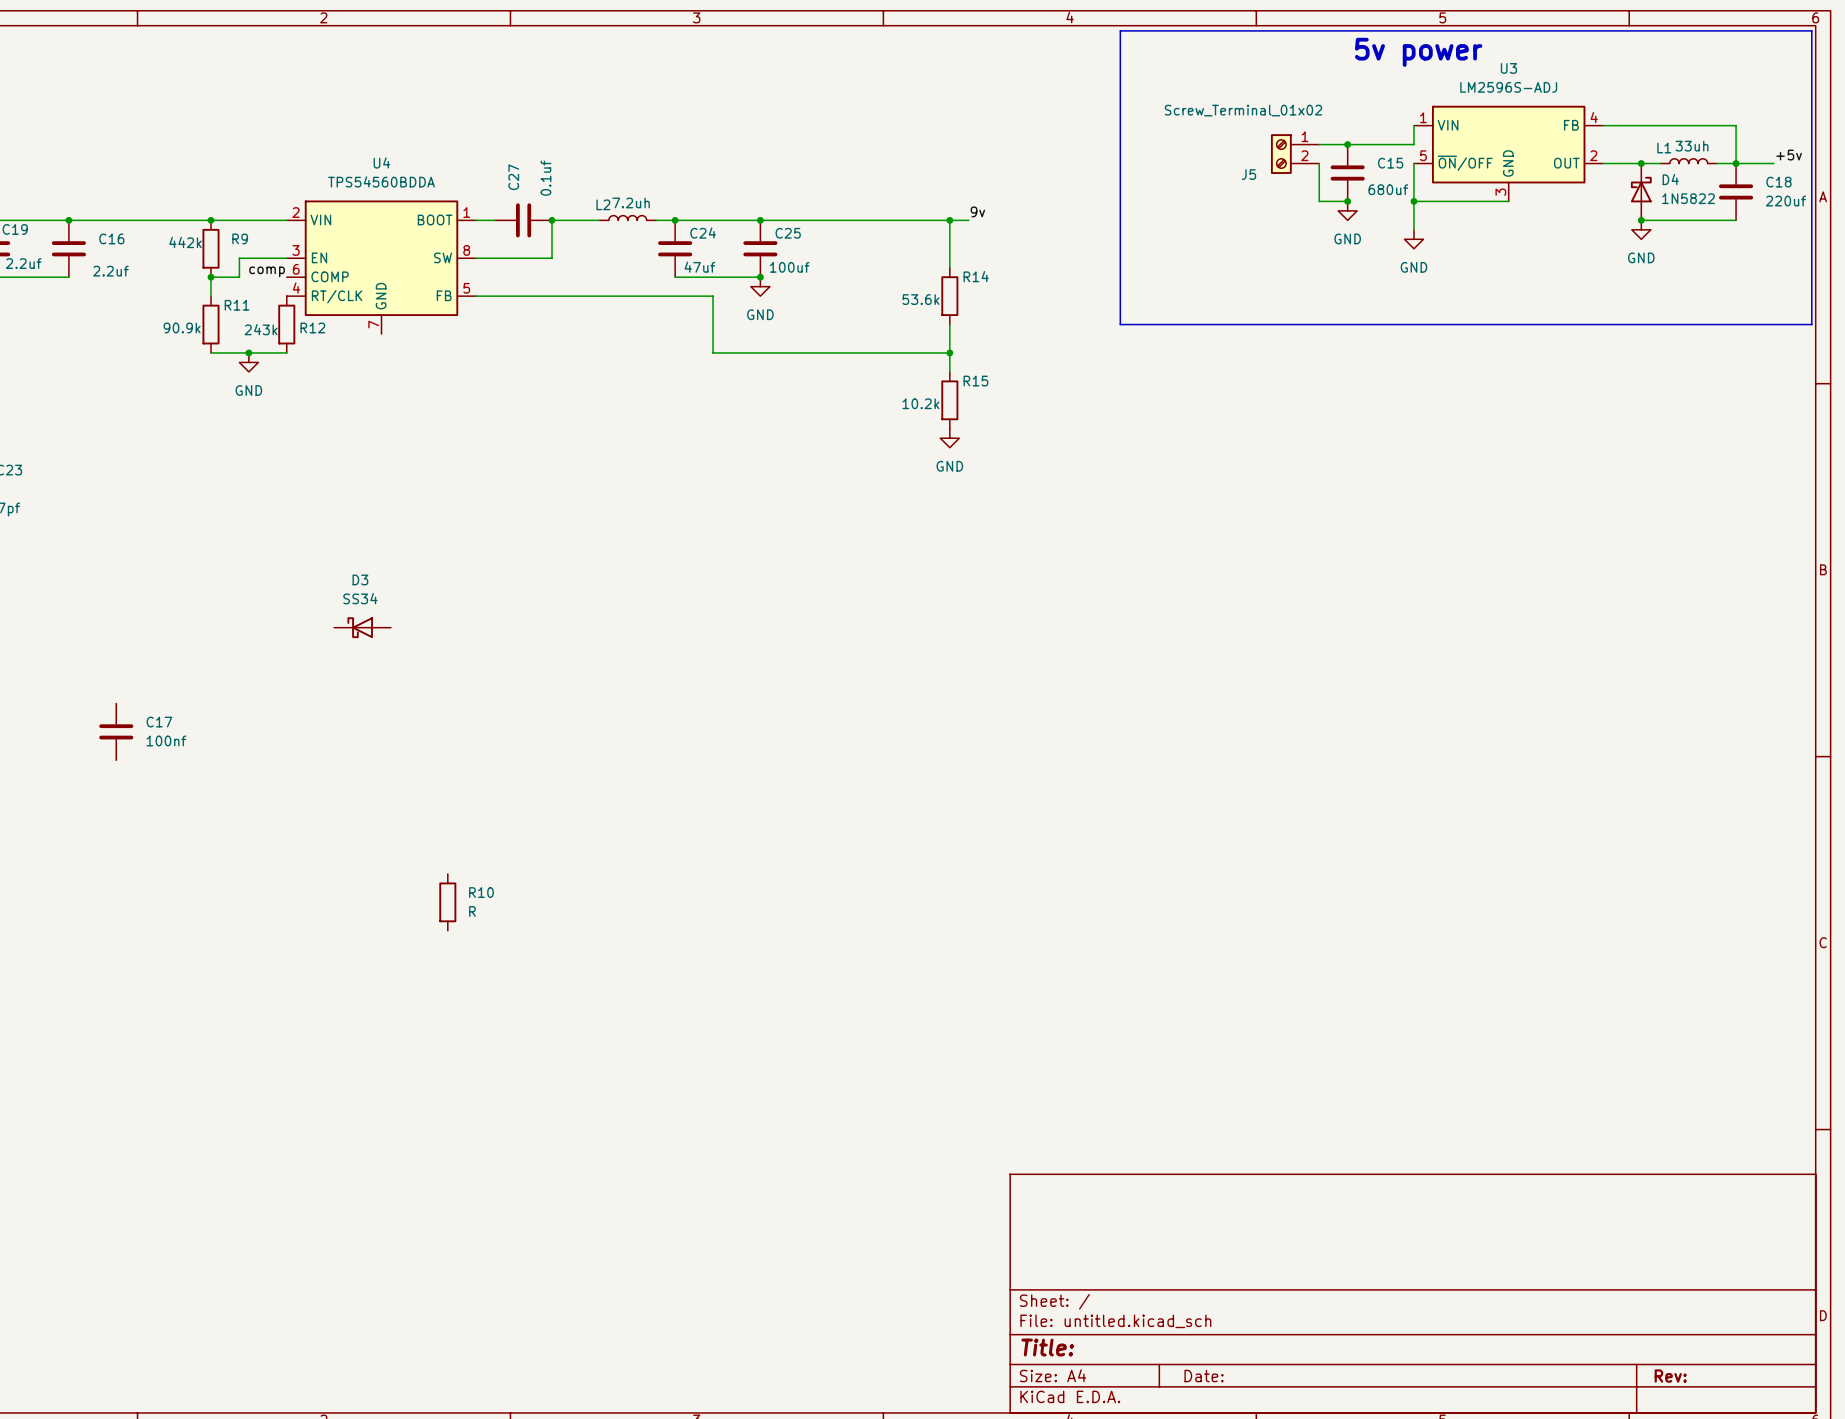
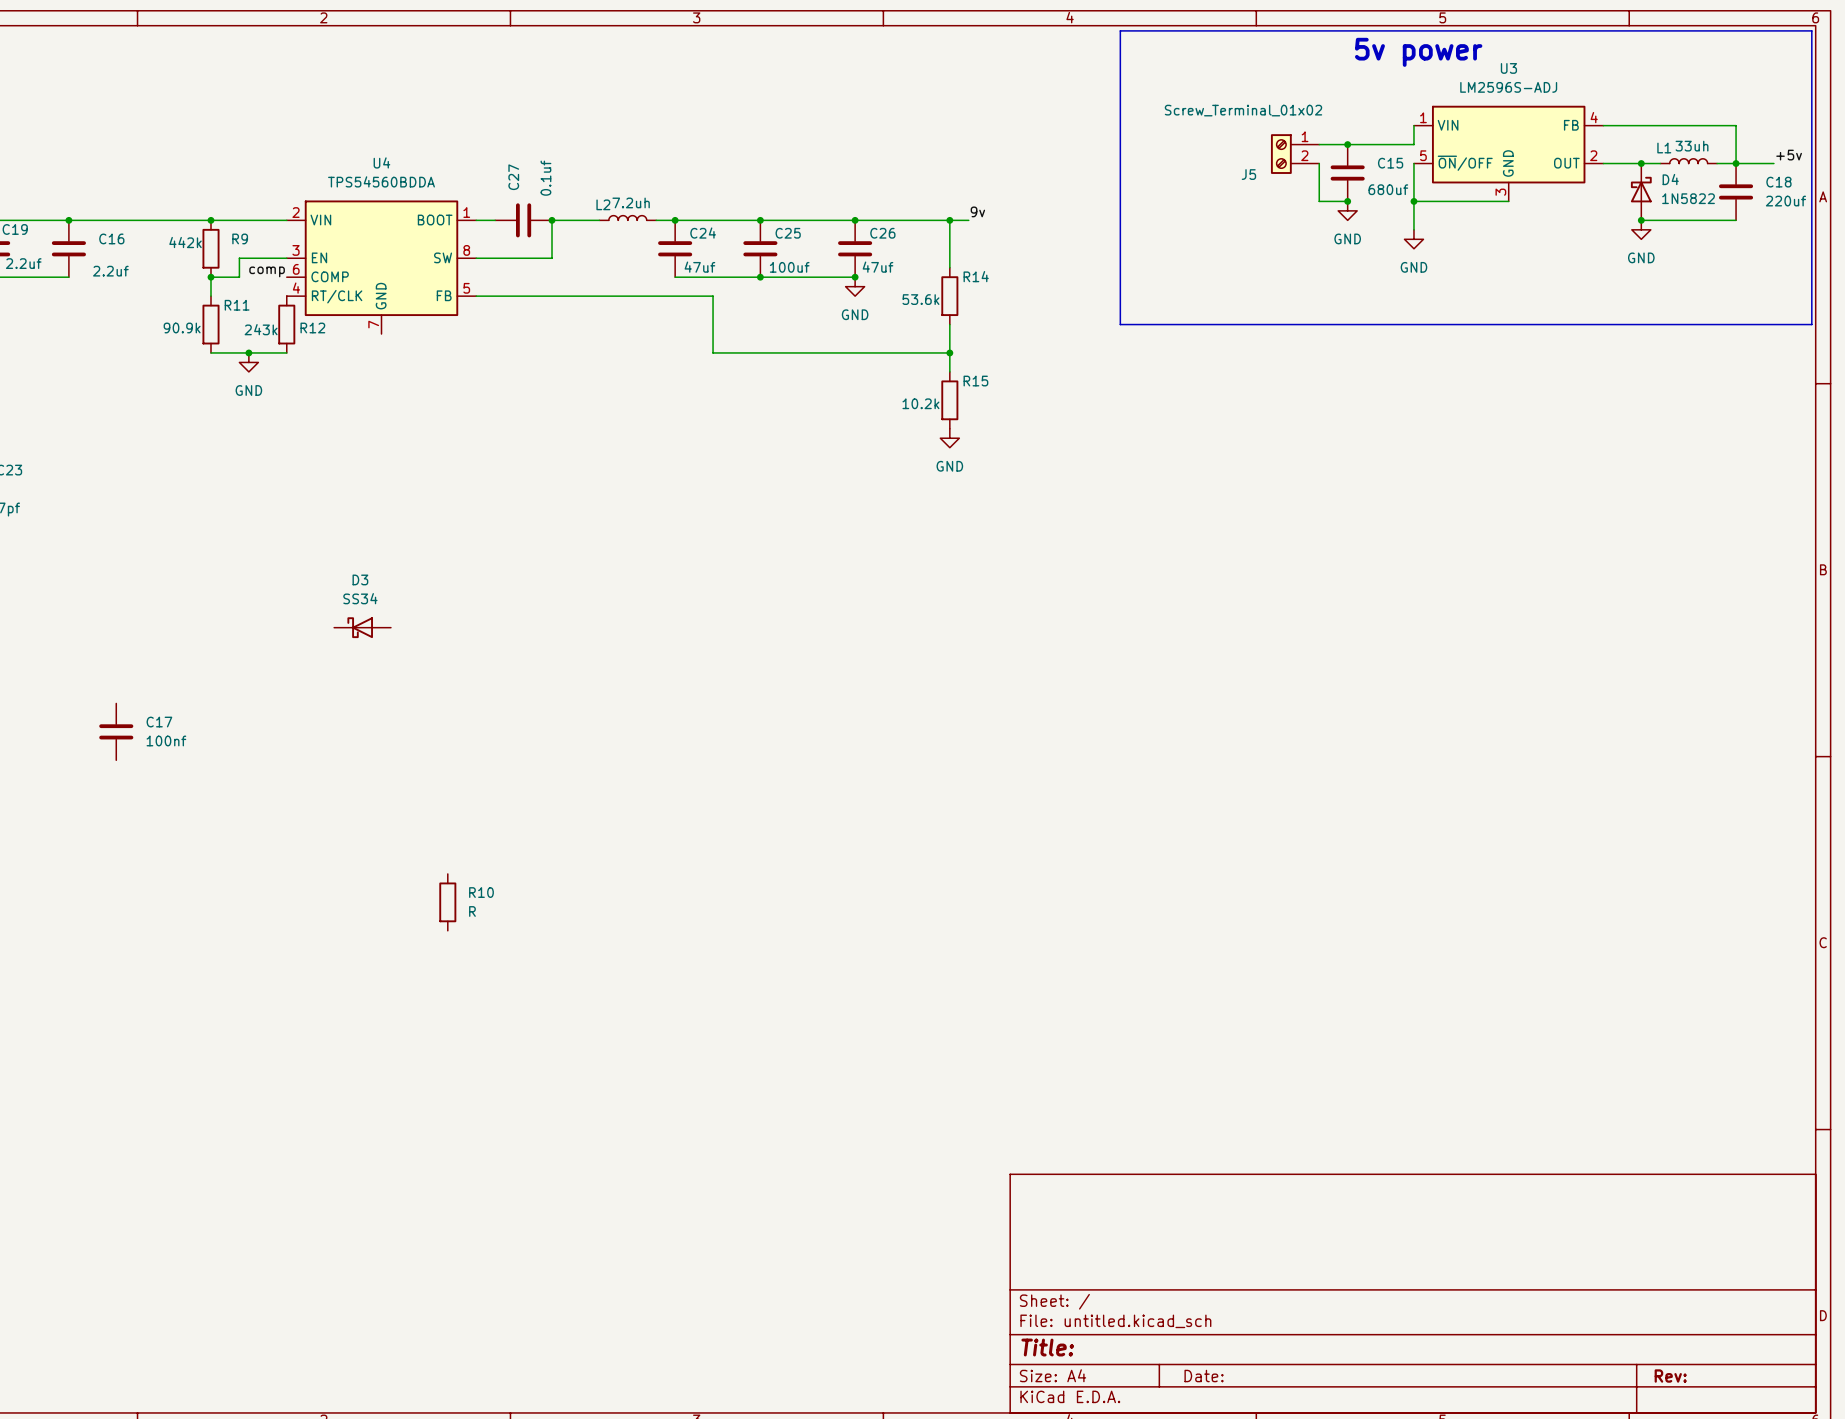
junction: none -> (855, 220)
C26: none -> 47uf (855, 248)
wire: none -> (760, 277) (855, 277)
junction: none -> (855, 277)
power symbol position: GND (760, 286) -> GND (855, 286)

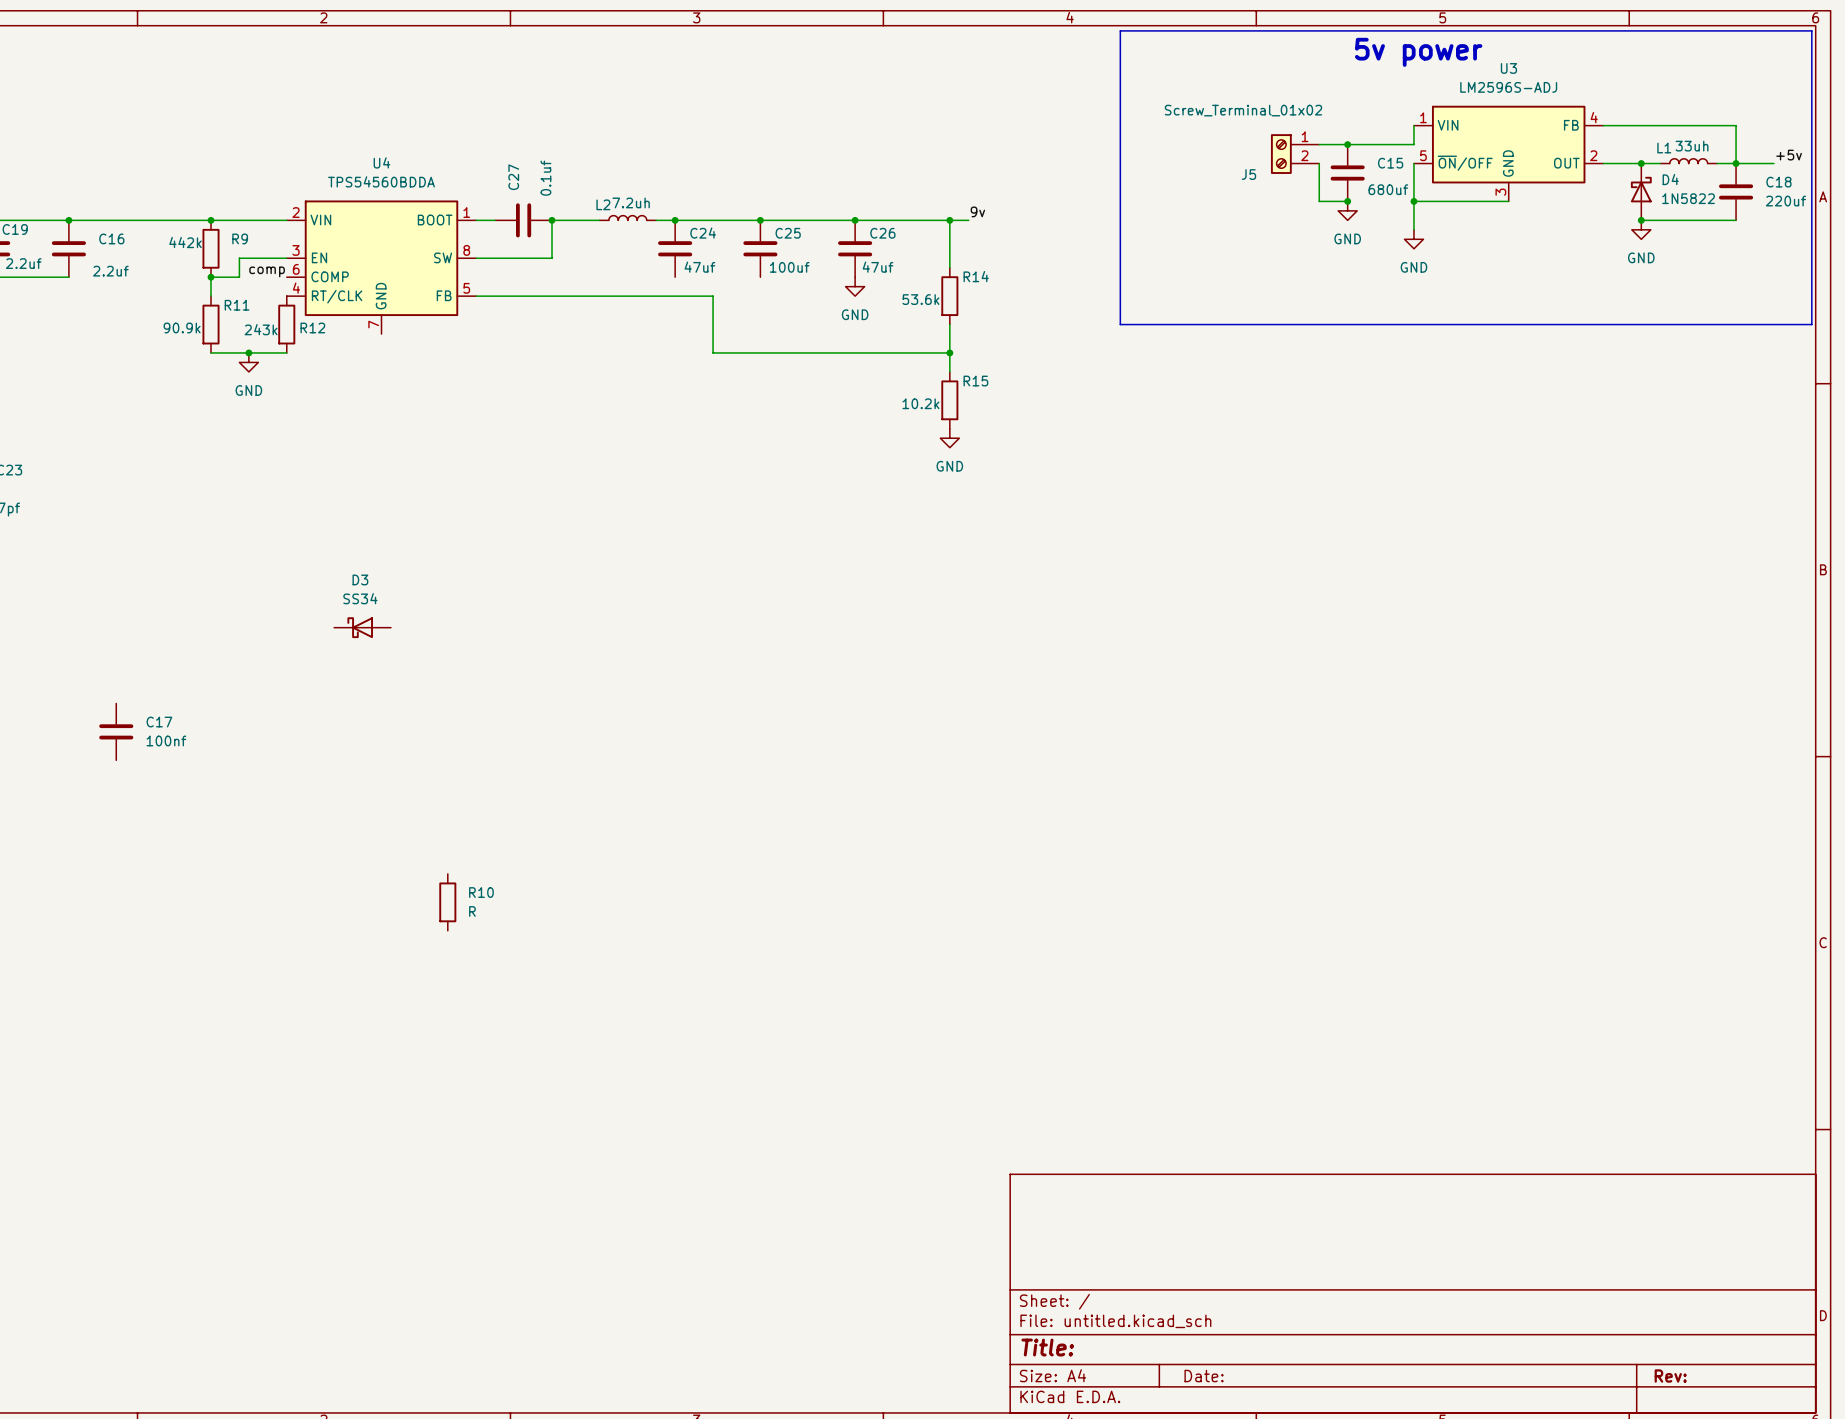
wire: (675, 277) (855, 277) -> none
junction: (760, 277) -> none
junction: (855, 277) -> none

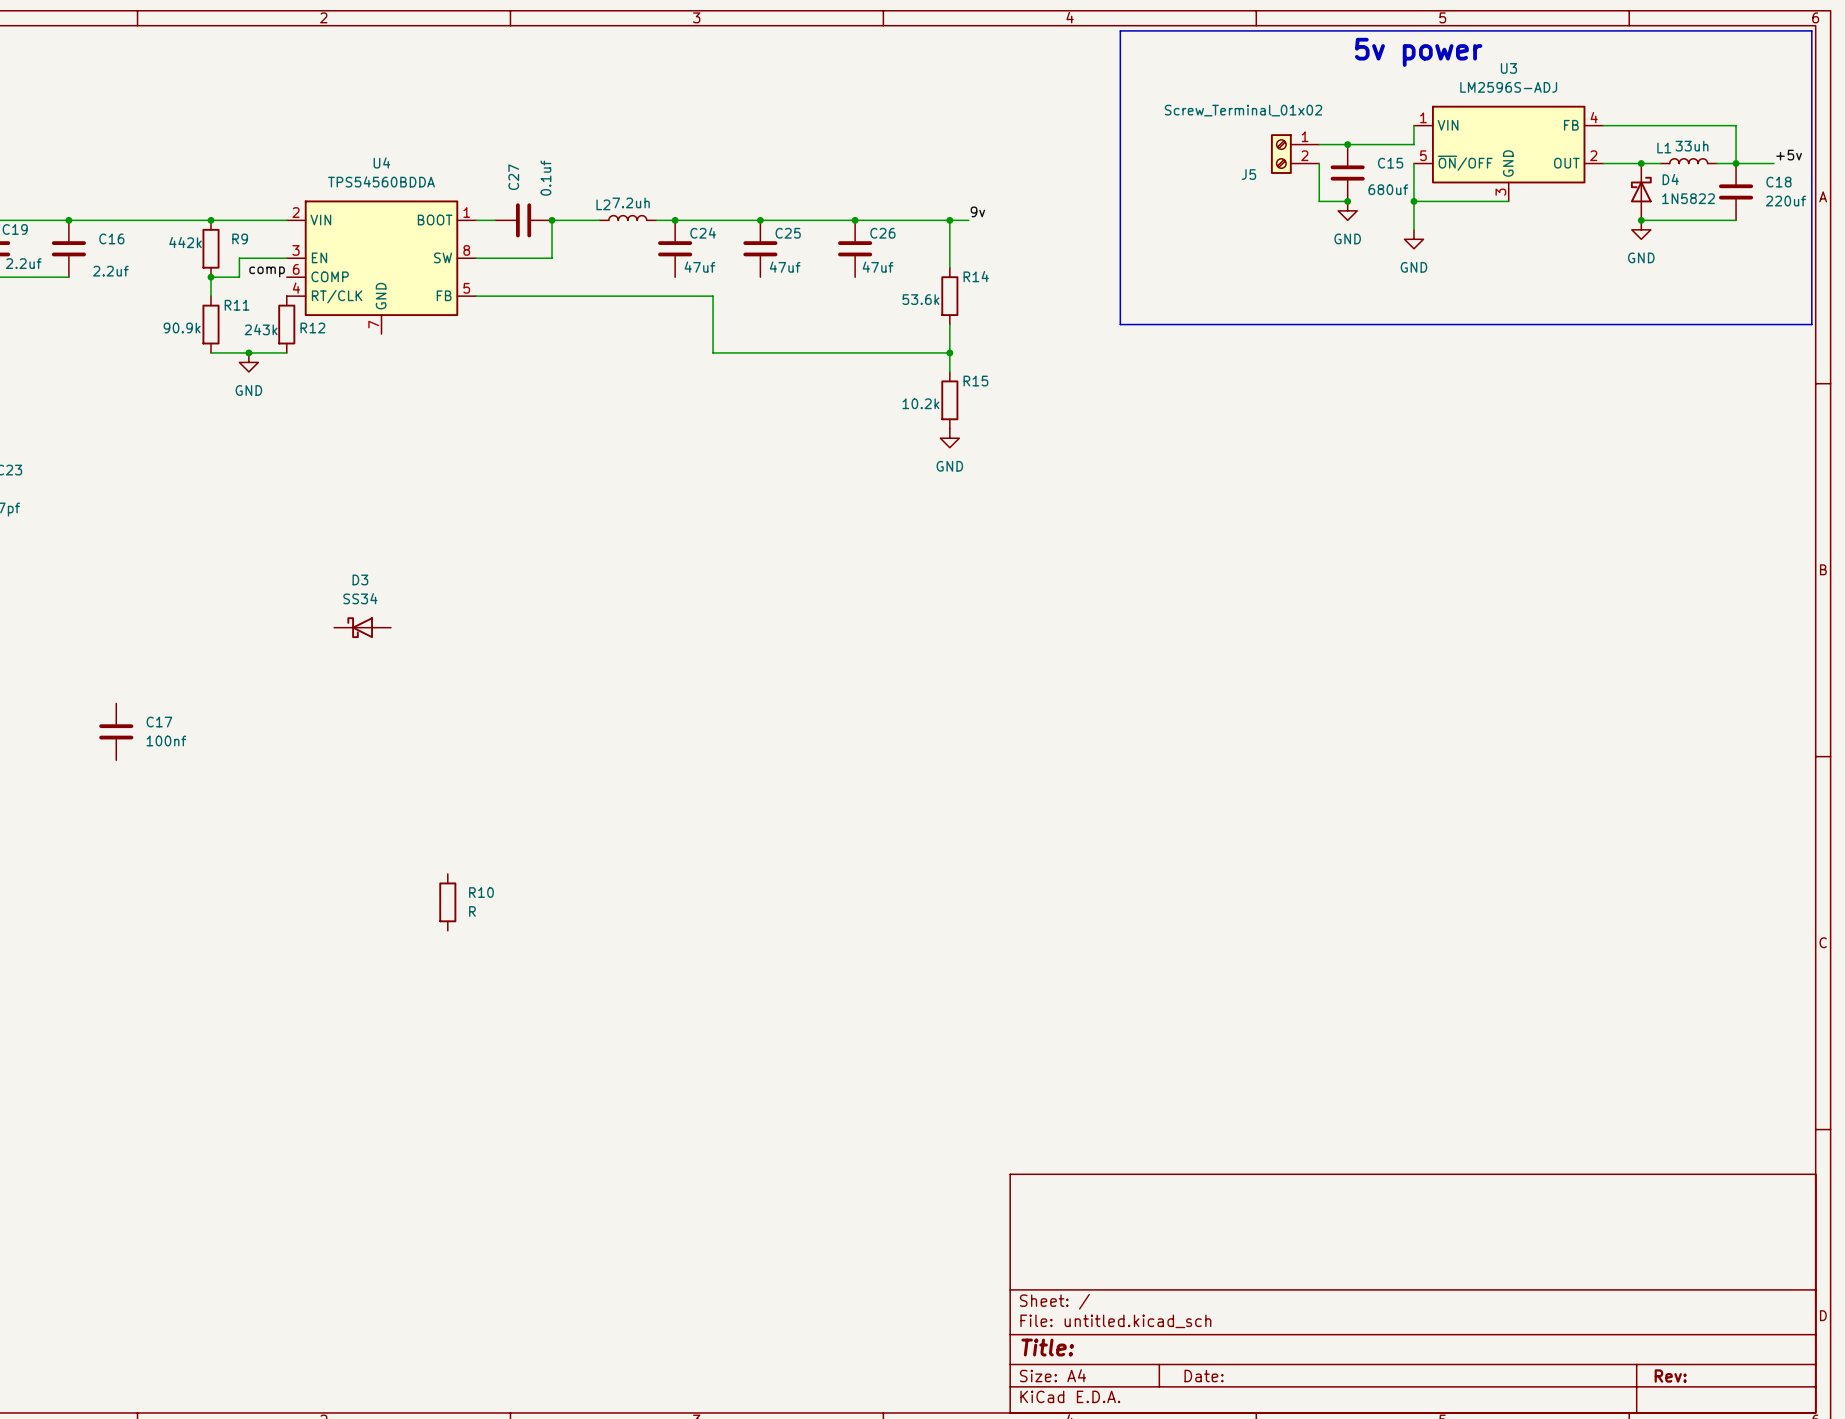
C25 value: 100uf (789, 267) -> 47uf (785, 267)
power symbol: GND (855, 286) -> none

